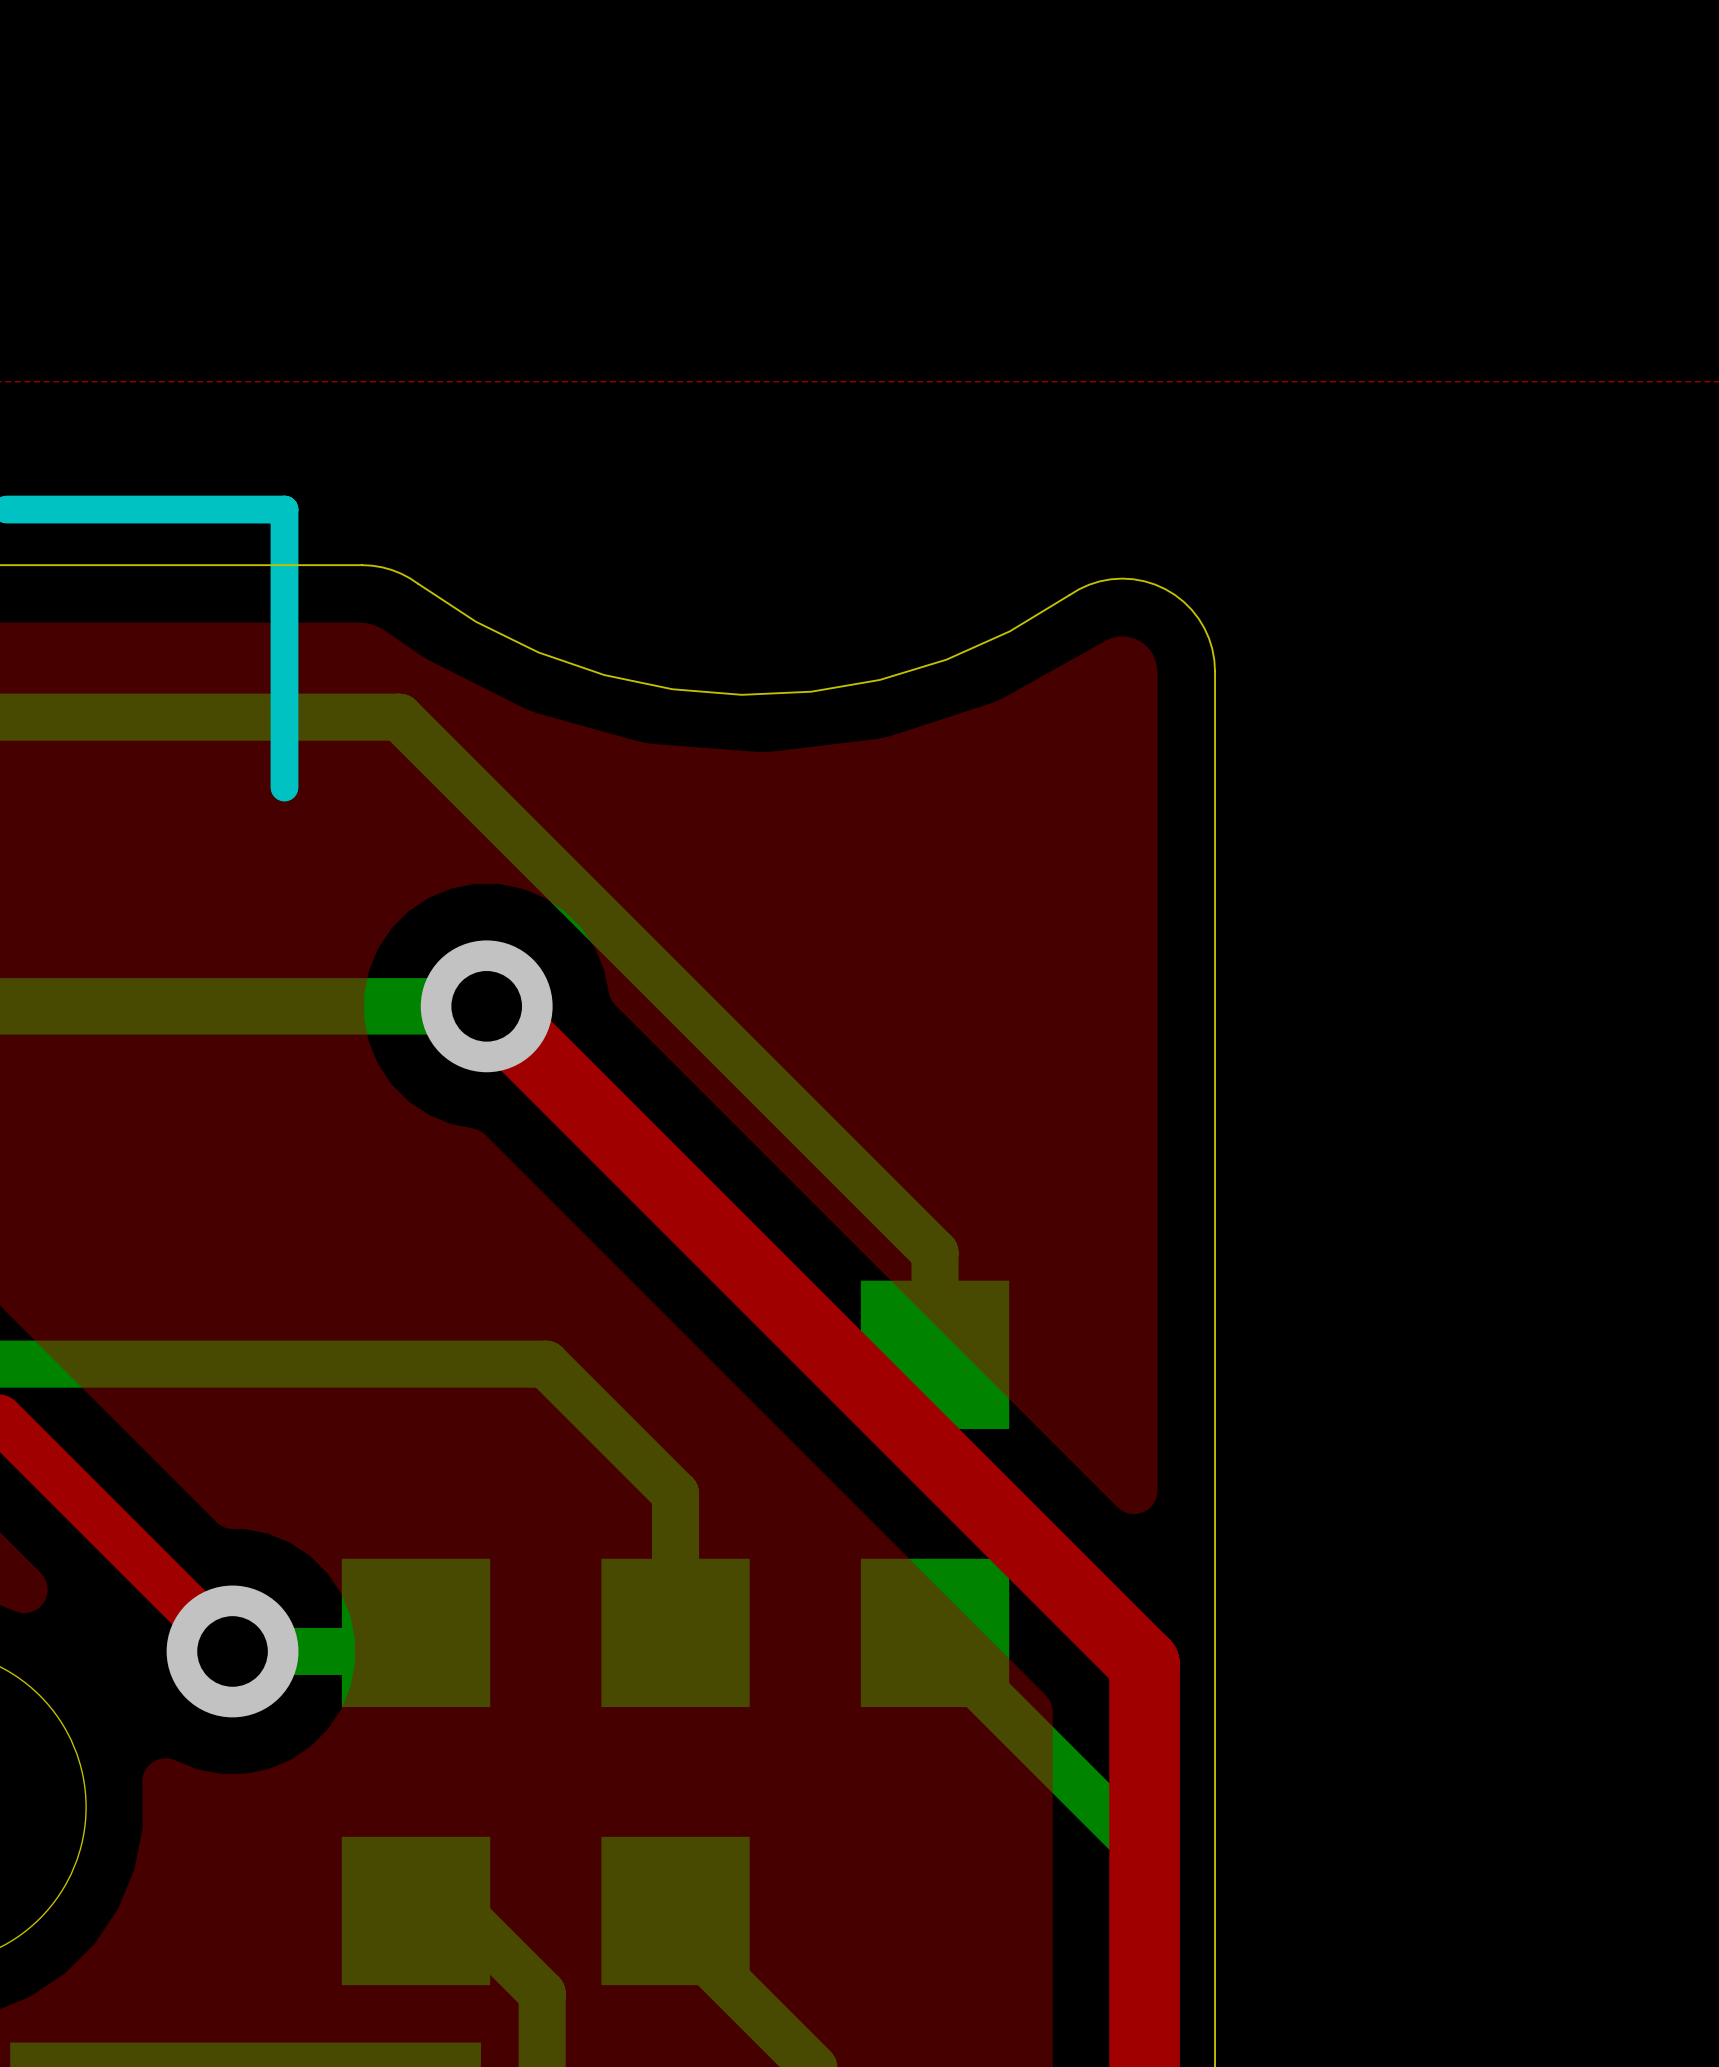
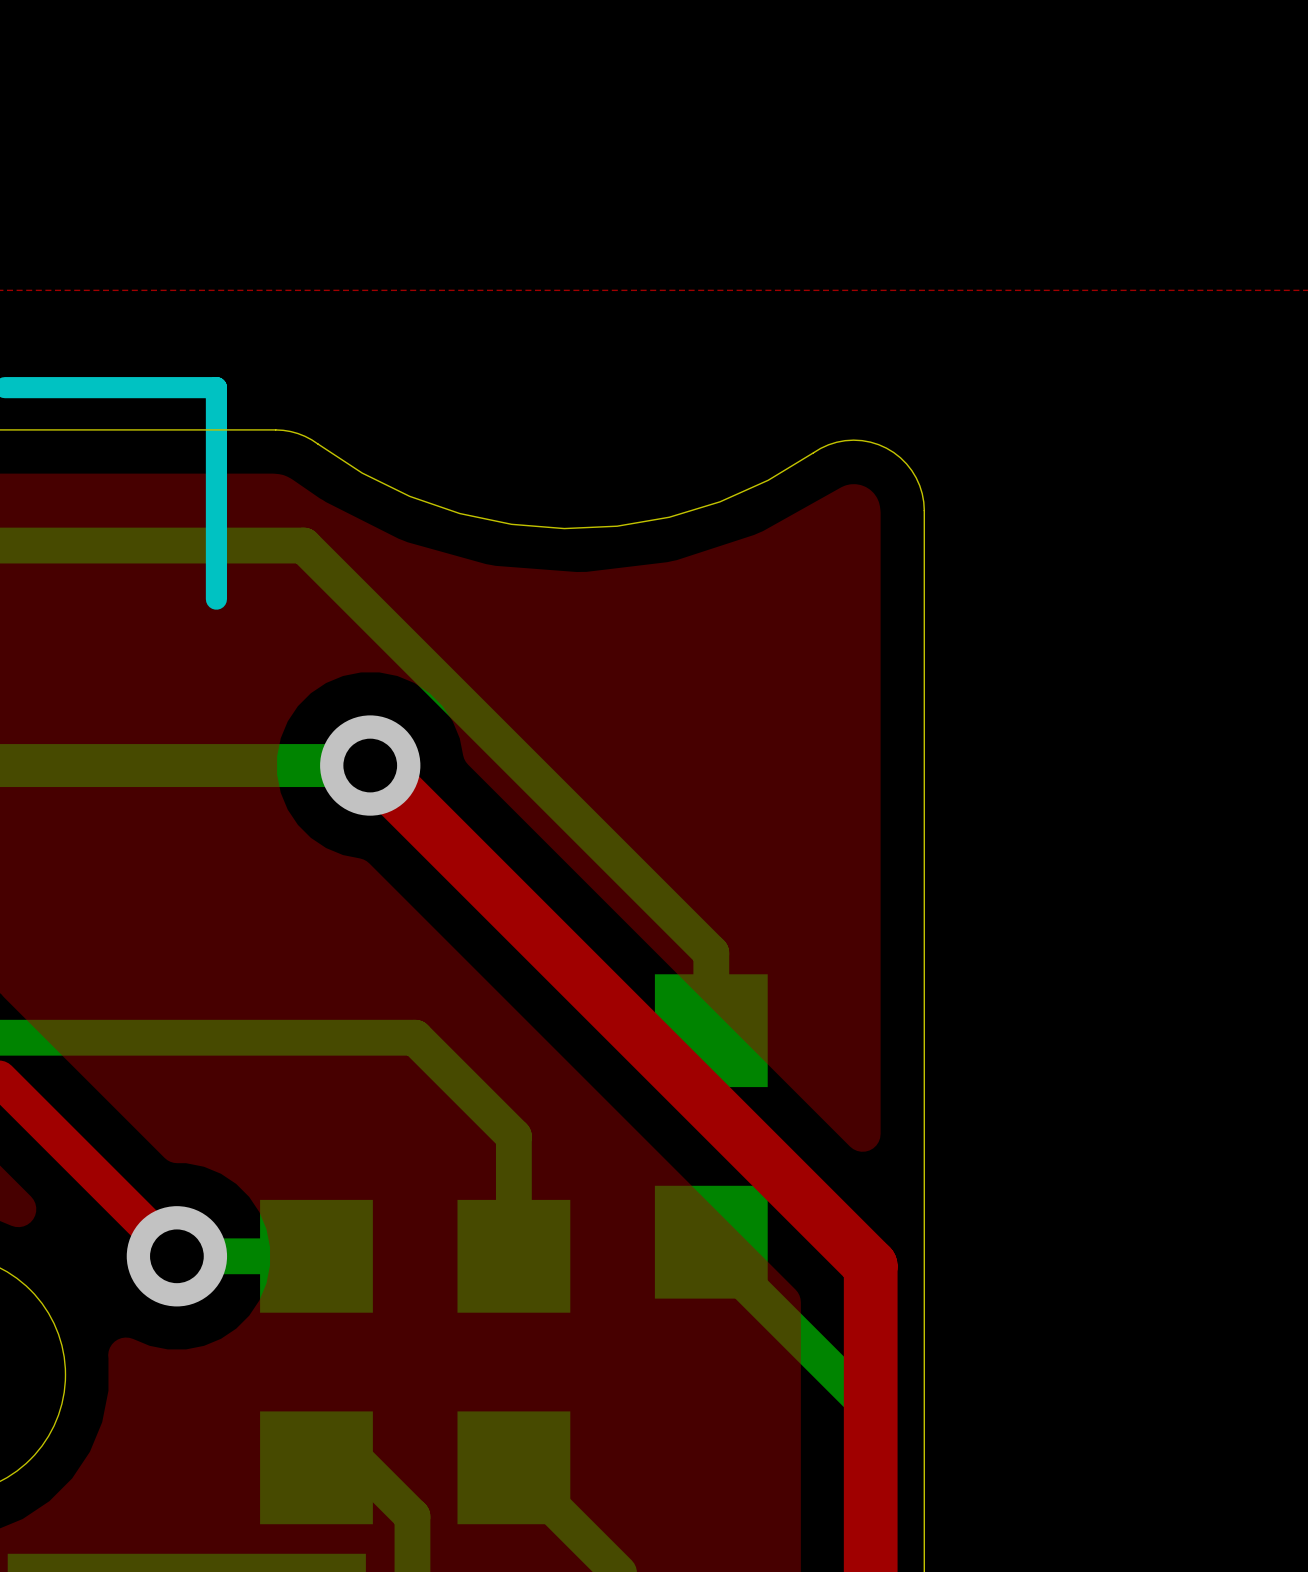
part position: (416, 1771) -> (316, 1362)
part position: (675, 1771) -> (513, 1362)

